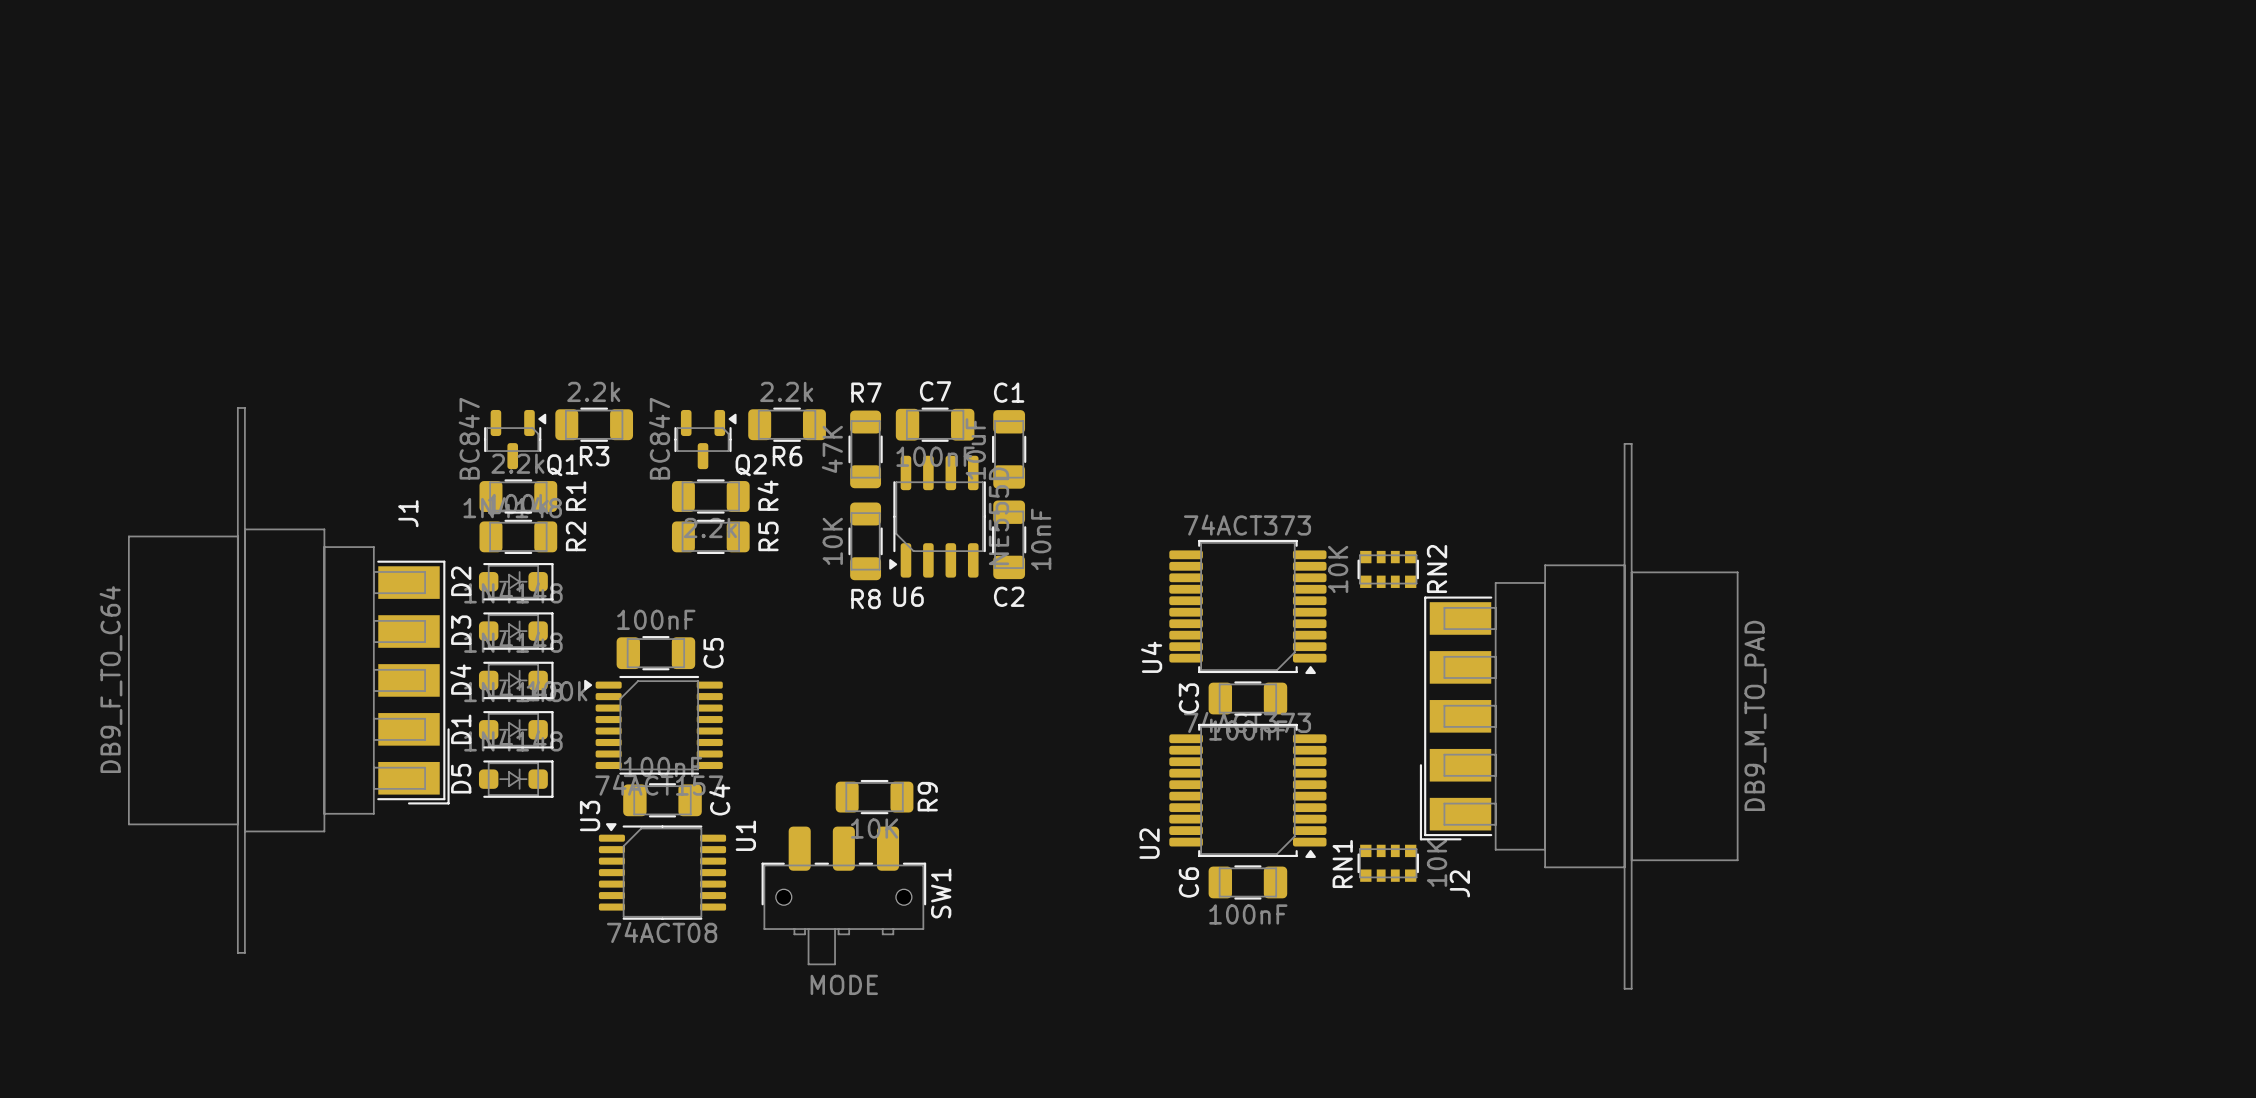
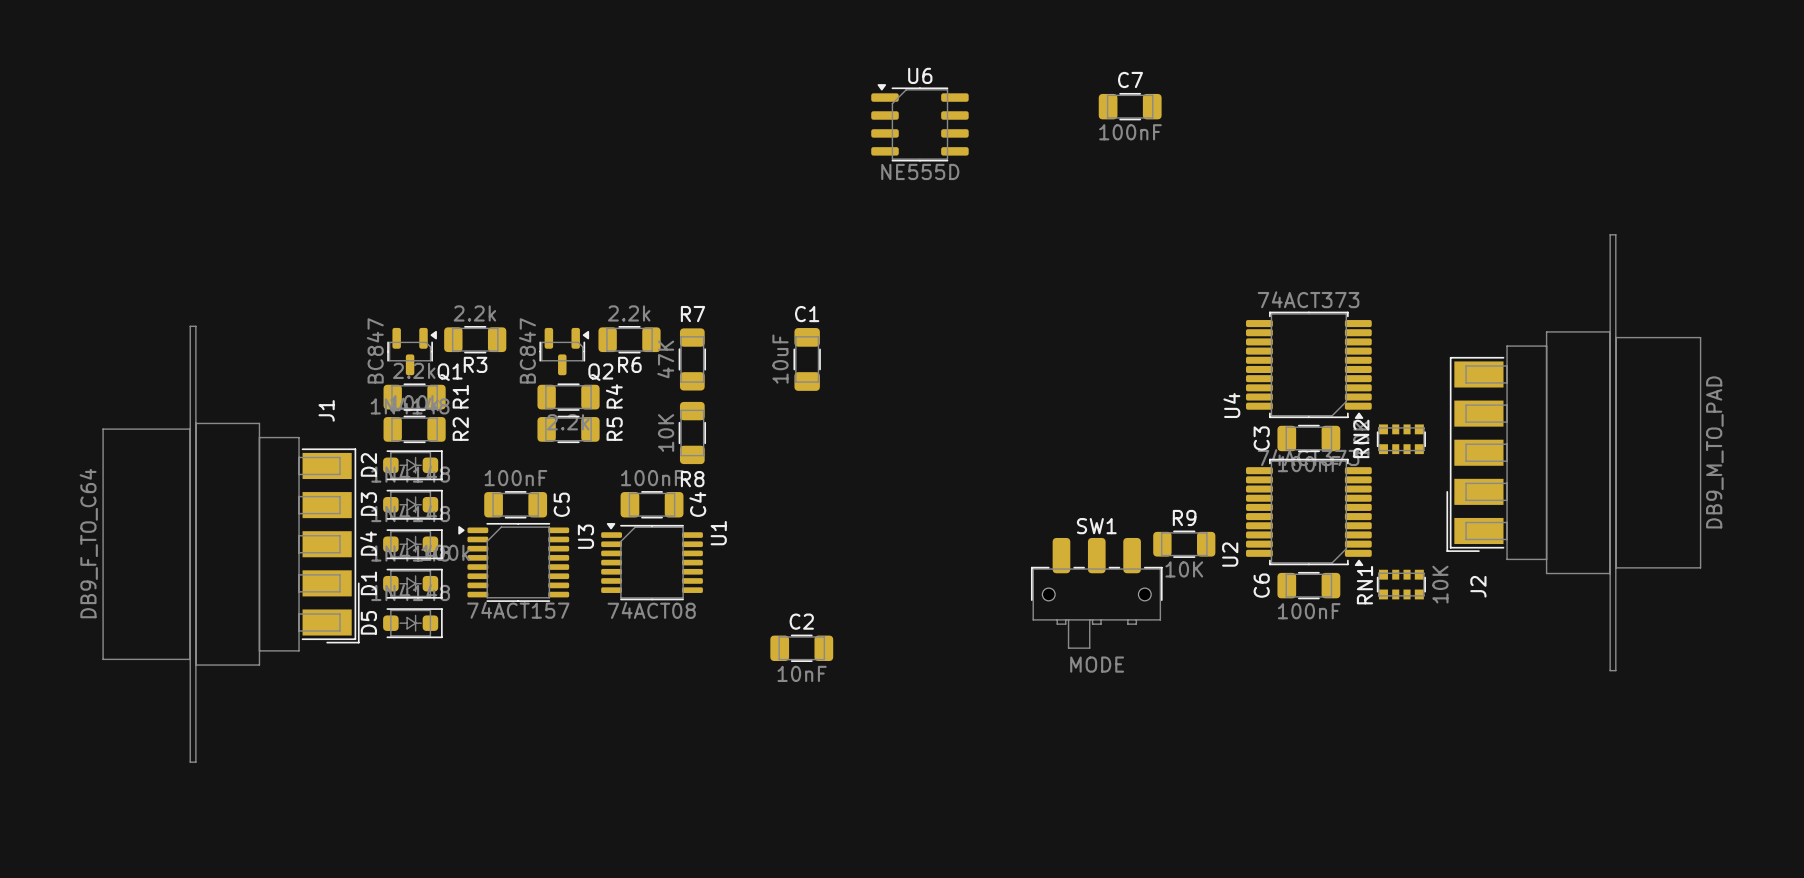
C7 position: (935, 424) -> (1130, 106)
U6 rotation: 0° (937, 516) -> 90° clockwise (919, 122)
U6 position: (937, 516) -> (919, 122)
C2 rotation: 0° (1009, 539) -> 90° clockwise (801, 648)
C2 position: (1009, 539) -> (801, 648)
RN2 position: (1388, 569) -> (1401, 439)
RN2 name position: RN2 (1437, 569) -> RN2 (1361, 438)
U6 name position: U6 (908, 596) -> U6 (920, 75)
C2 name position: C2 (1009, 596) -> C2 (801, 621)
U4 position: (1247, 606) -> (1308, 365)
C5 position: (655, 653) -> (515, 504)
C3 position: (1247, 698) -> (1308, 438)
J2 position: (1579, 716) -> (1573, 452)
U3 position: (653, 725) -> (513, 562)
U2 position: (1247, 790) -> (1308, 512)
R9 name rotation: 0° (927, 796) -> 90° clockwise (1184, 517)
R9 name position: R9 (927, 796) -> R9 (1184, 517)
R9 position: (874, 797) -> (1184, 544)
C4 position: (662, 800) -> (652, 504)
U3 name position: U3 (590, 815) -> U3 (585, 536)
RN1 position: (1388, 863) -> (1401, 584)
U1 position: (662, 871) -> (652, 561)
C6 position: (1247, 882) -> (1308, 585)
SW1 name rotation: 0° (941, 893) -> 90° clockwise (1096, 526)
SW1 name position: SW1 (941, 893) -> SW1 (1096, 526)
SW1 position: (843, 895) -> (1096, 593)

